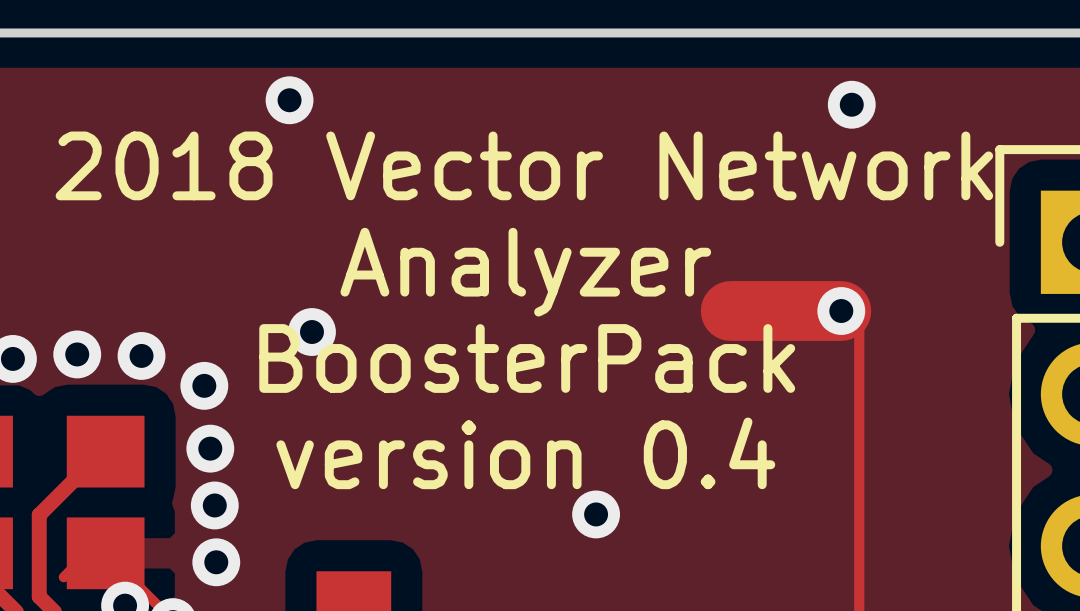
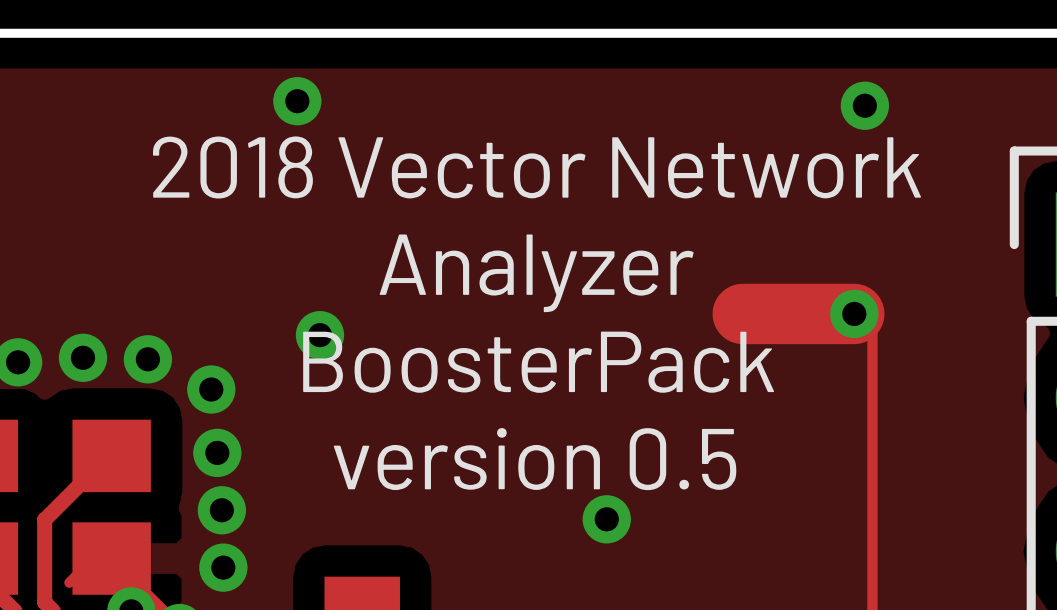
text: version 0.4 (525, 453) -> version 0.5 (535, 459)

